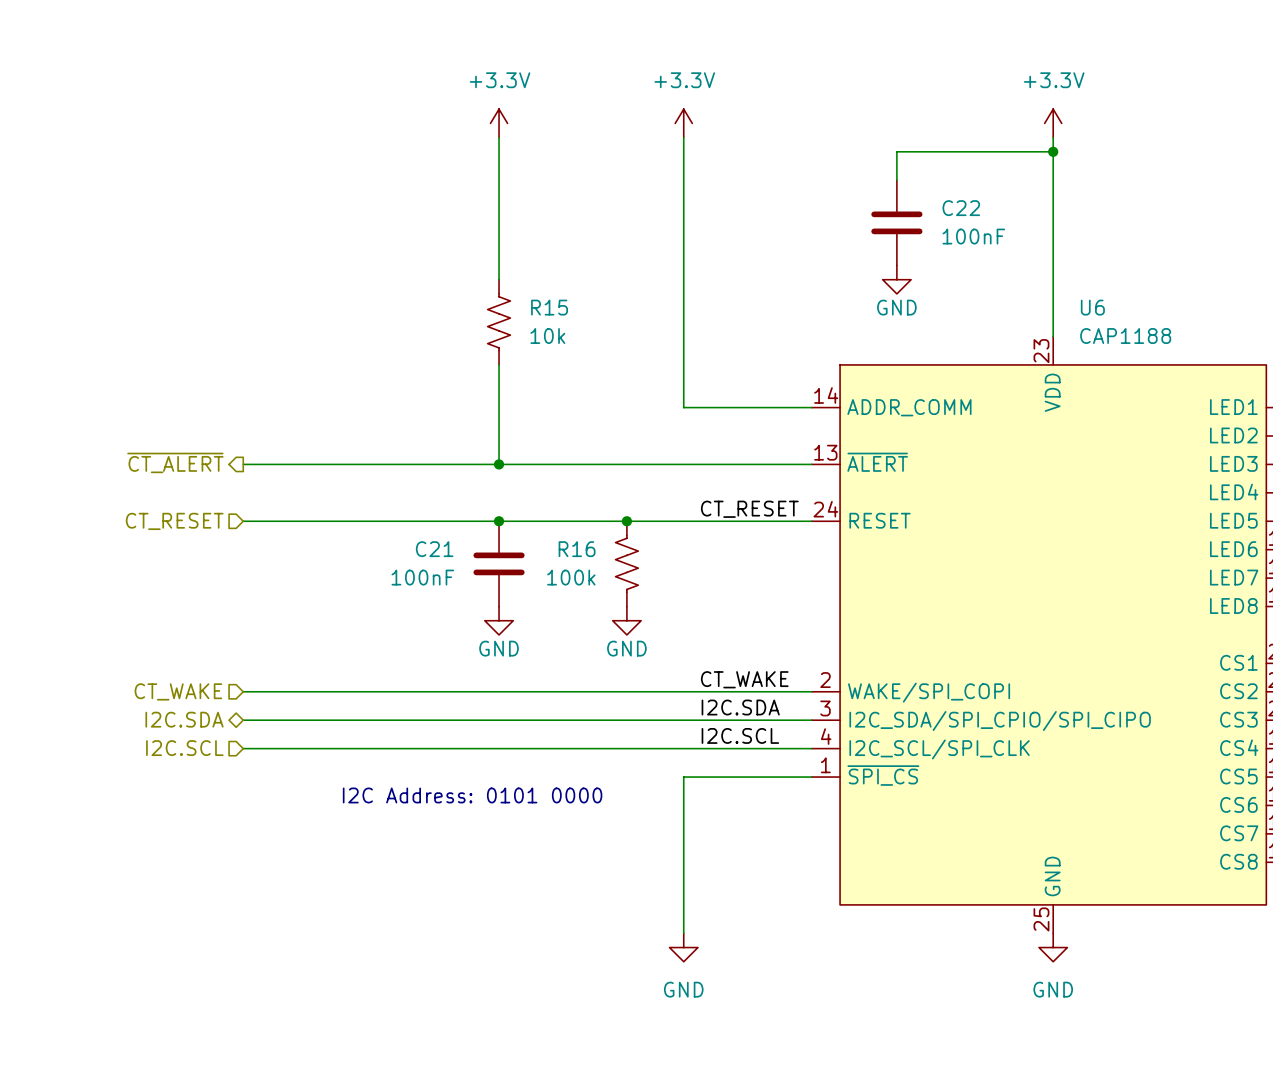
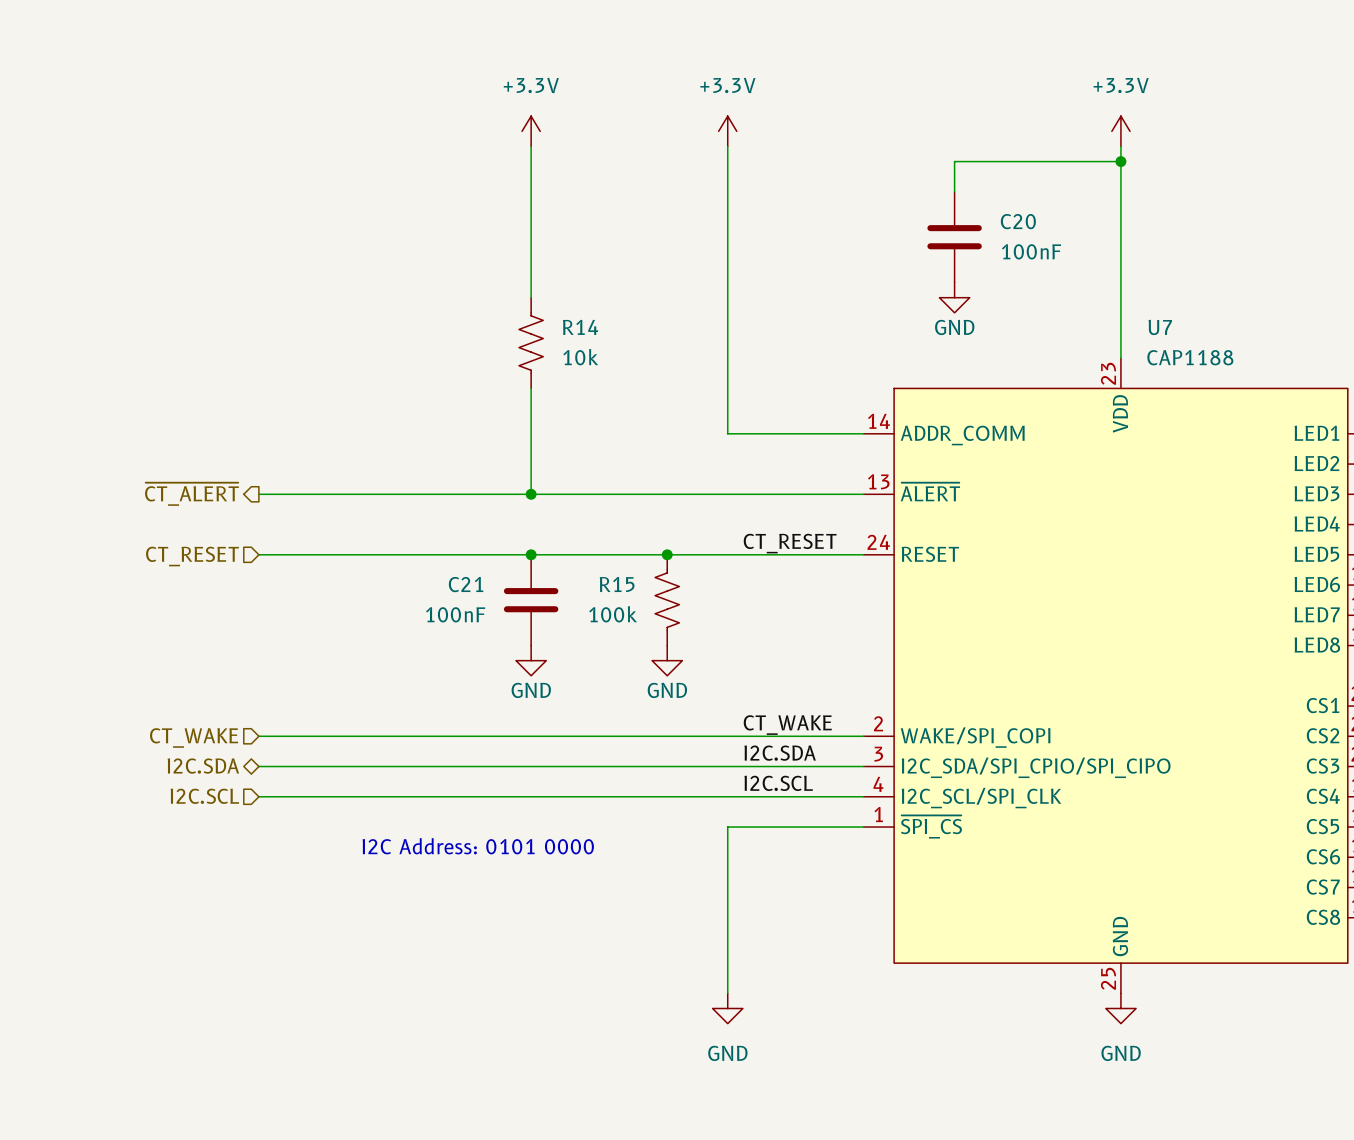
C22 name: C22 (961, 208) -> C20 (1018, 221)
R15 name: R15 (549, 307) -> R14 (580, 327)
U6 name: U6 (1092, 307) -> U7 (1160, 327)
R16 name: R16 (577, 549) -> R15 (617, 584)

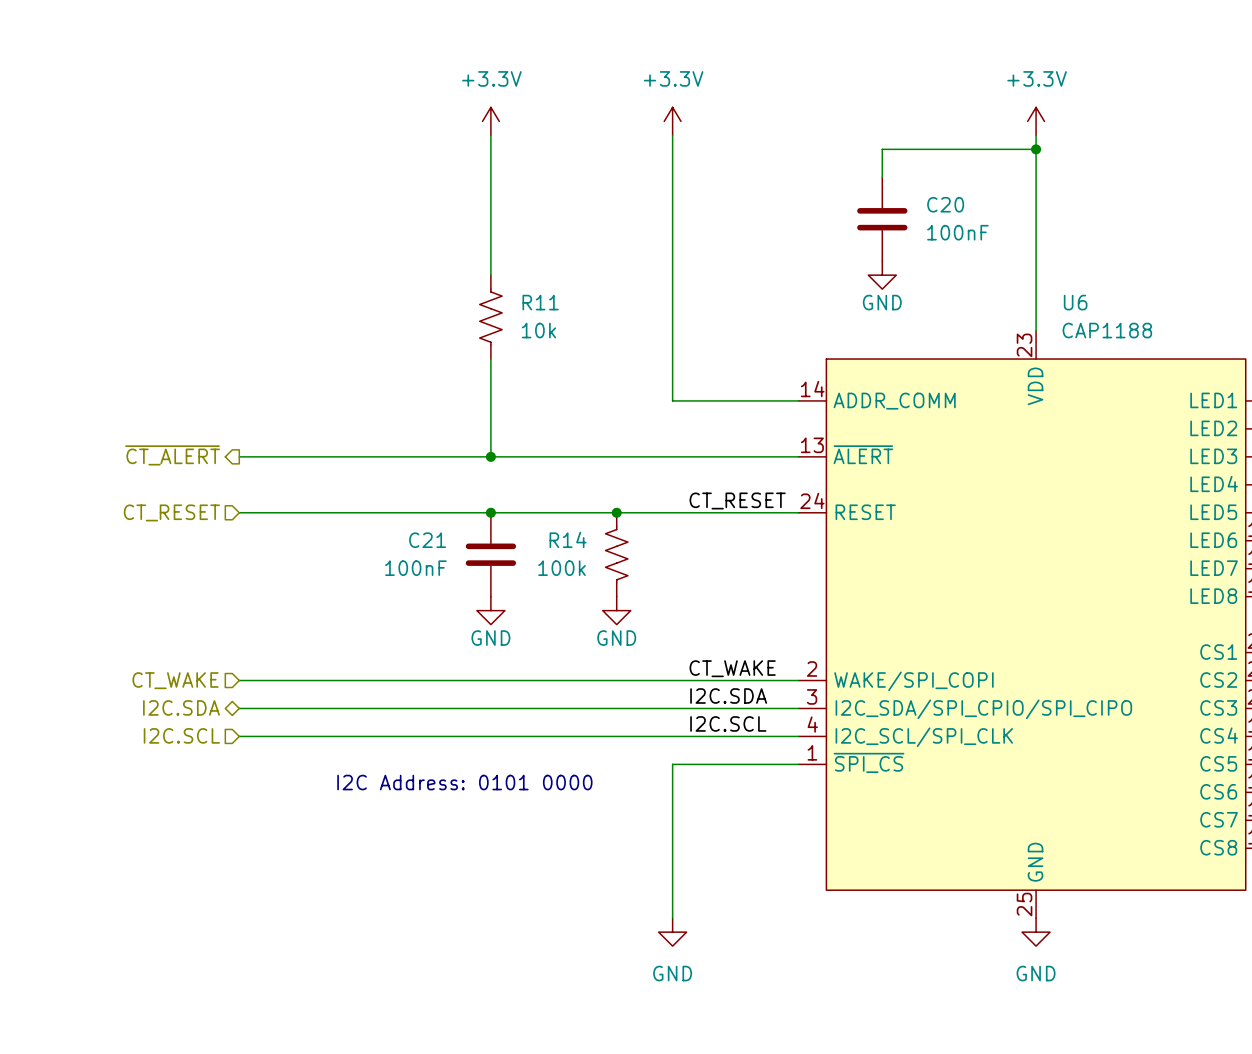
R14 name: R14 (580, 327) -> R11 (540, 302)
U7 name: U7 (1160, 327) -> U6 (1075, 302)
R15 name: R15 (617, 584) -> R14 (568, 539)

